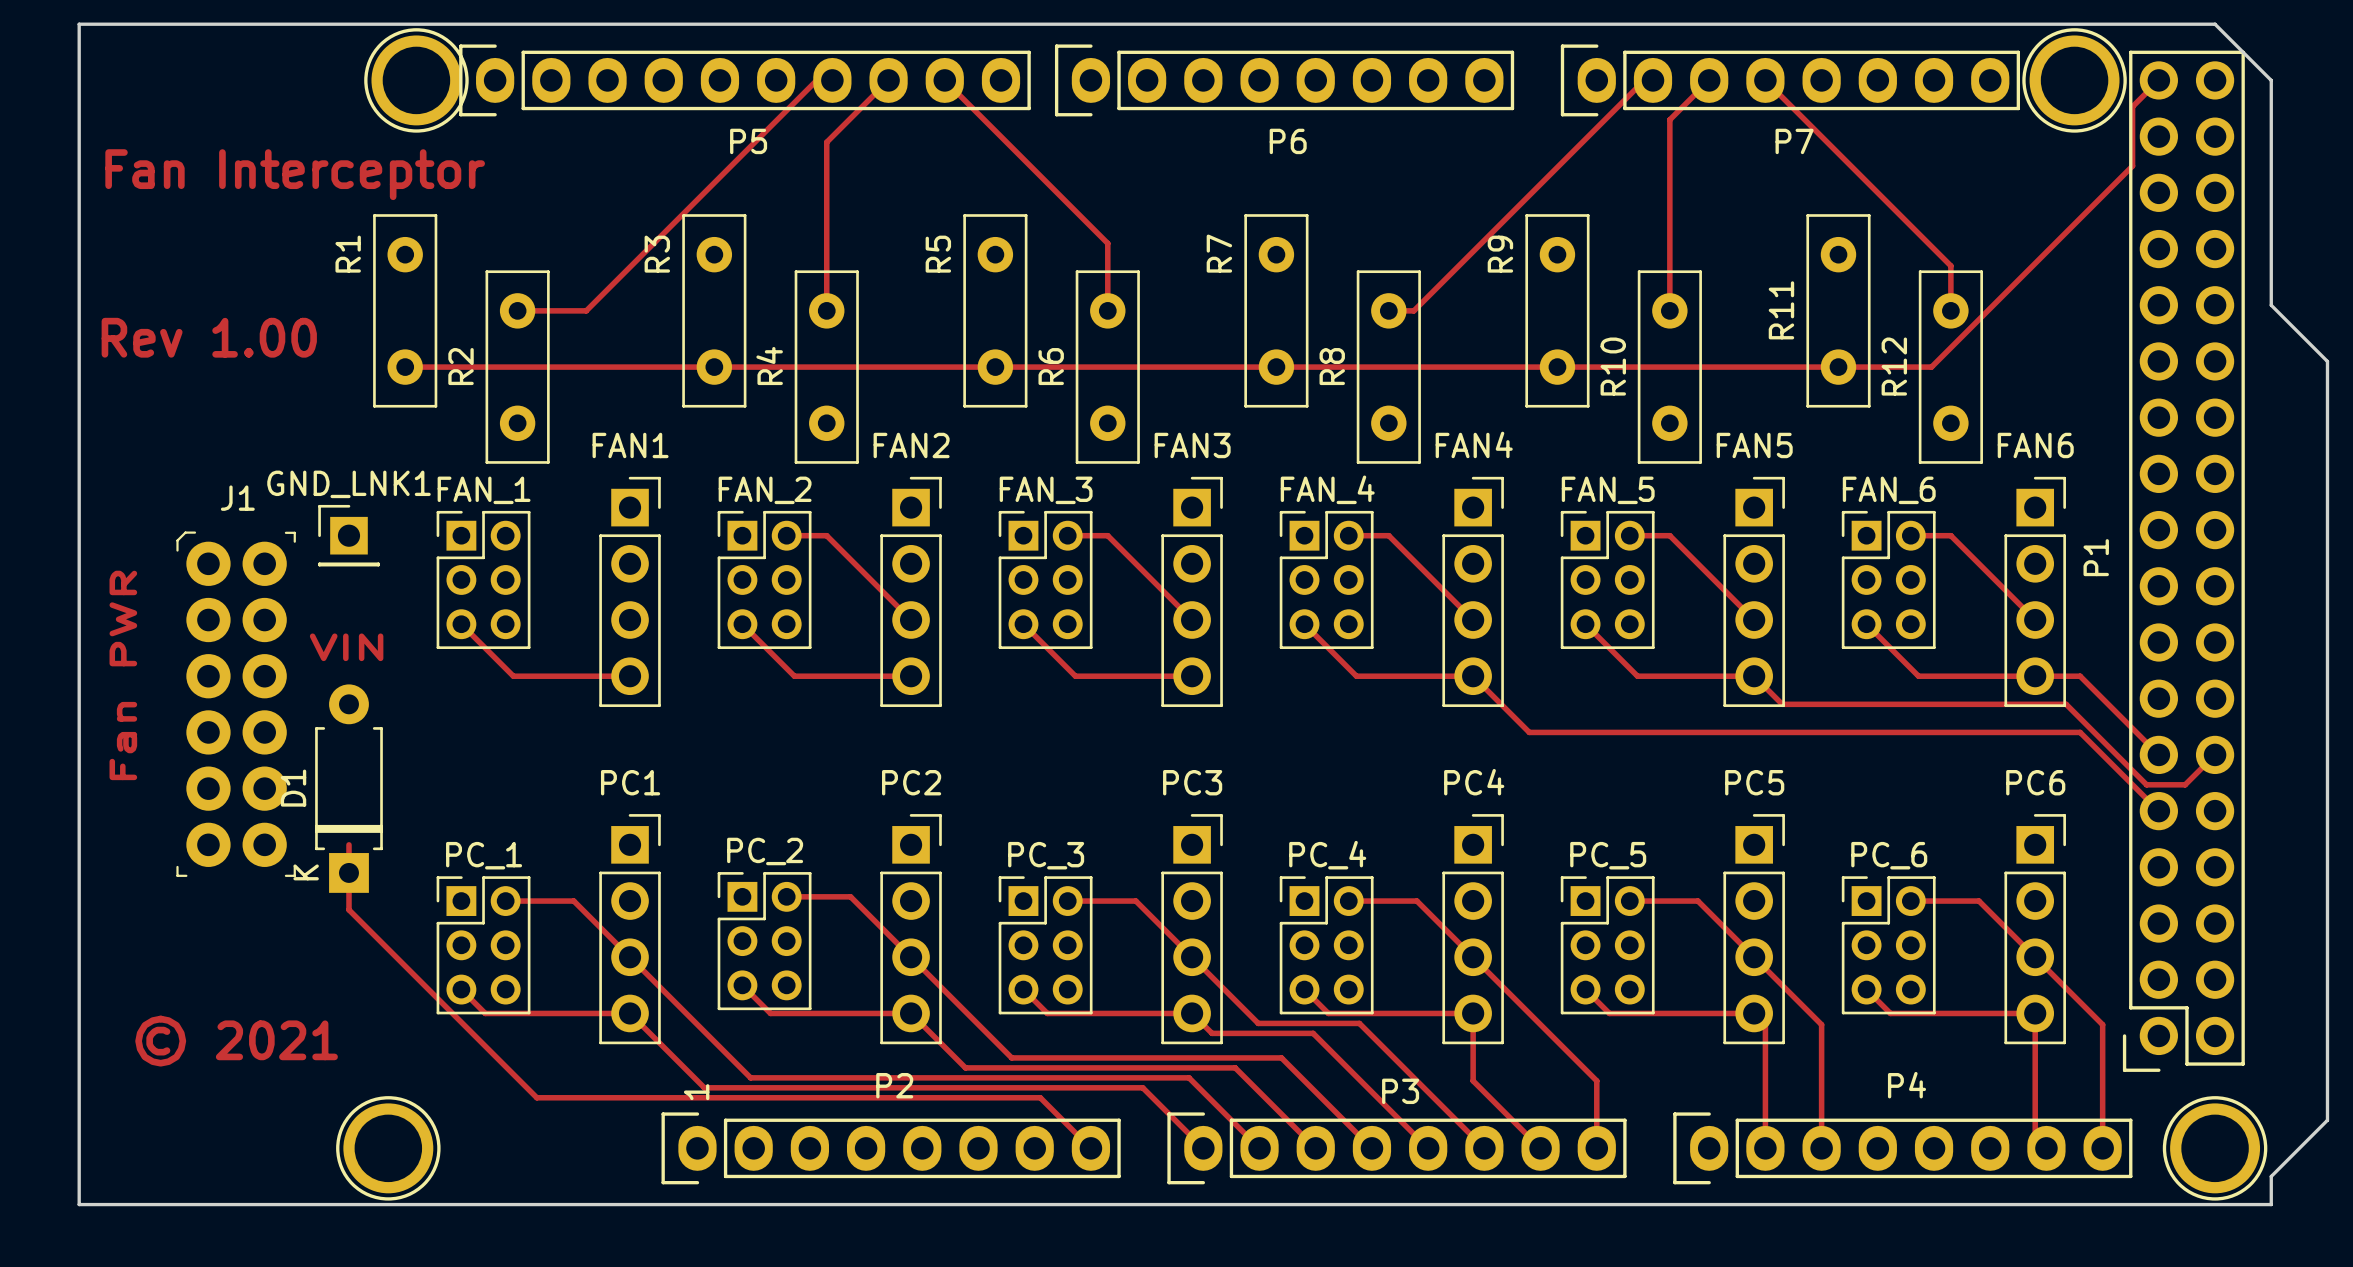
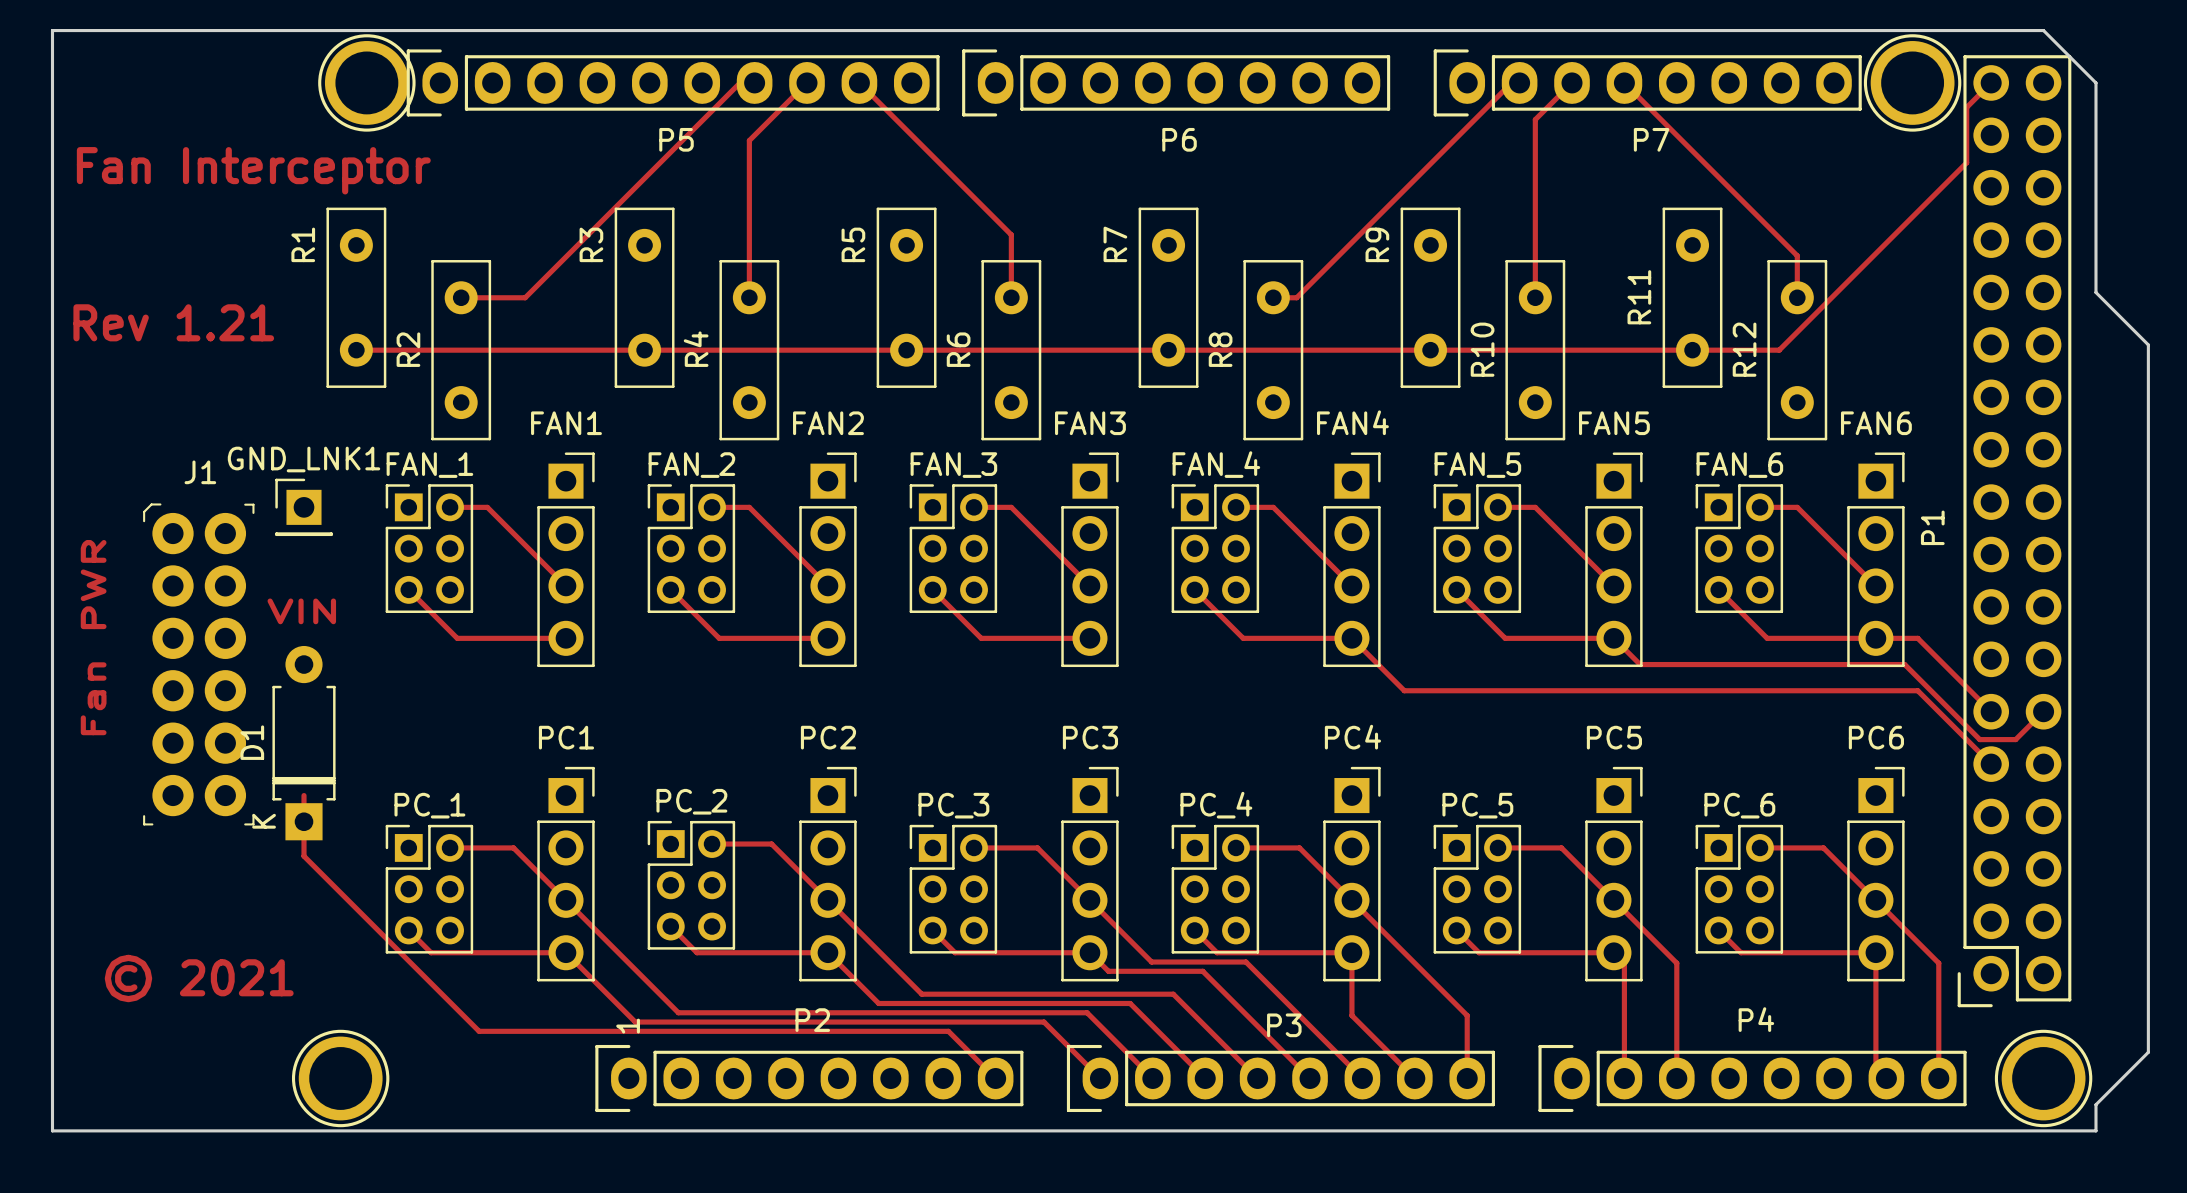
text: Rev 1.00 (209, 337) -> Rev 1.21 (173, 322)
track: none -> (450, 507) (487, 507) (565, 585)

